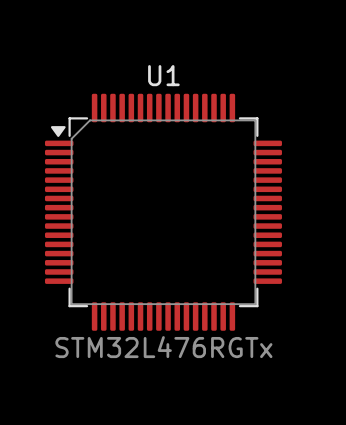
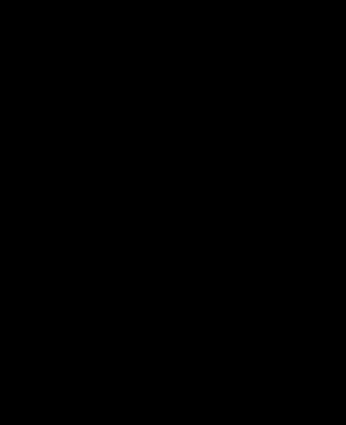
U1: STM32L476RGTx (163, 212) -> none

